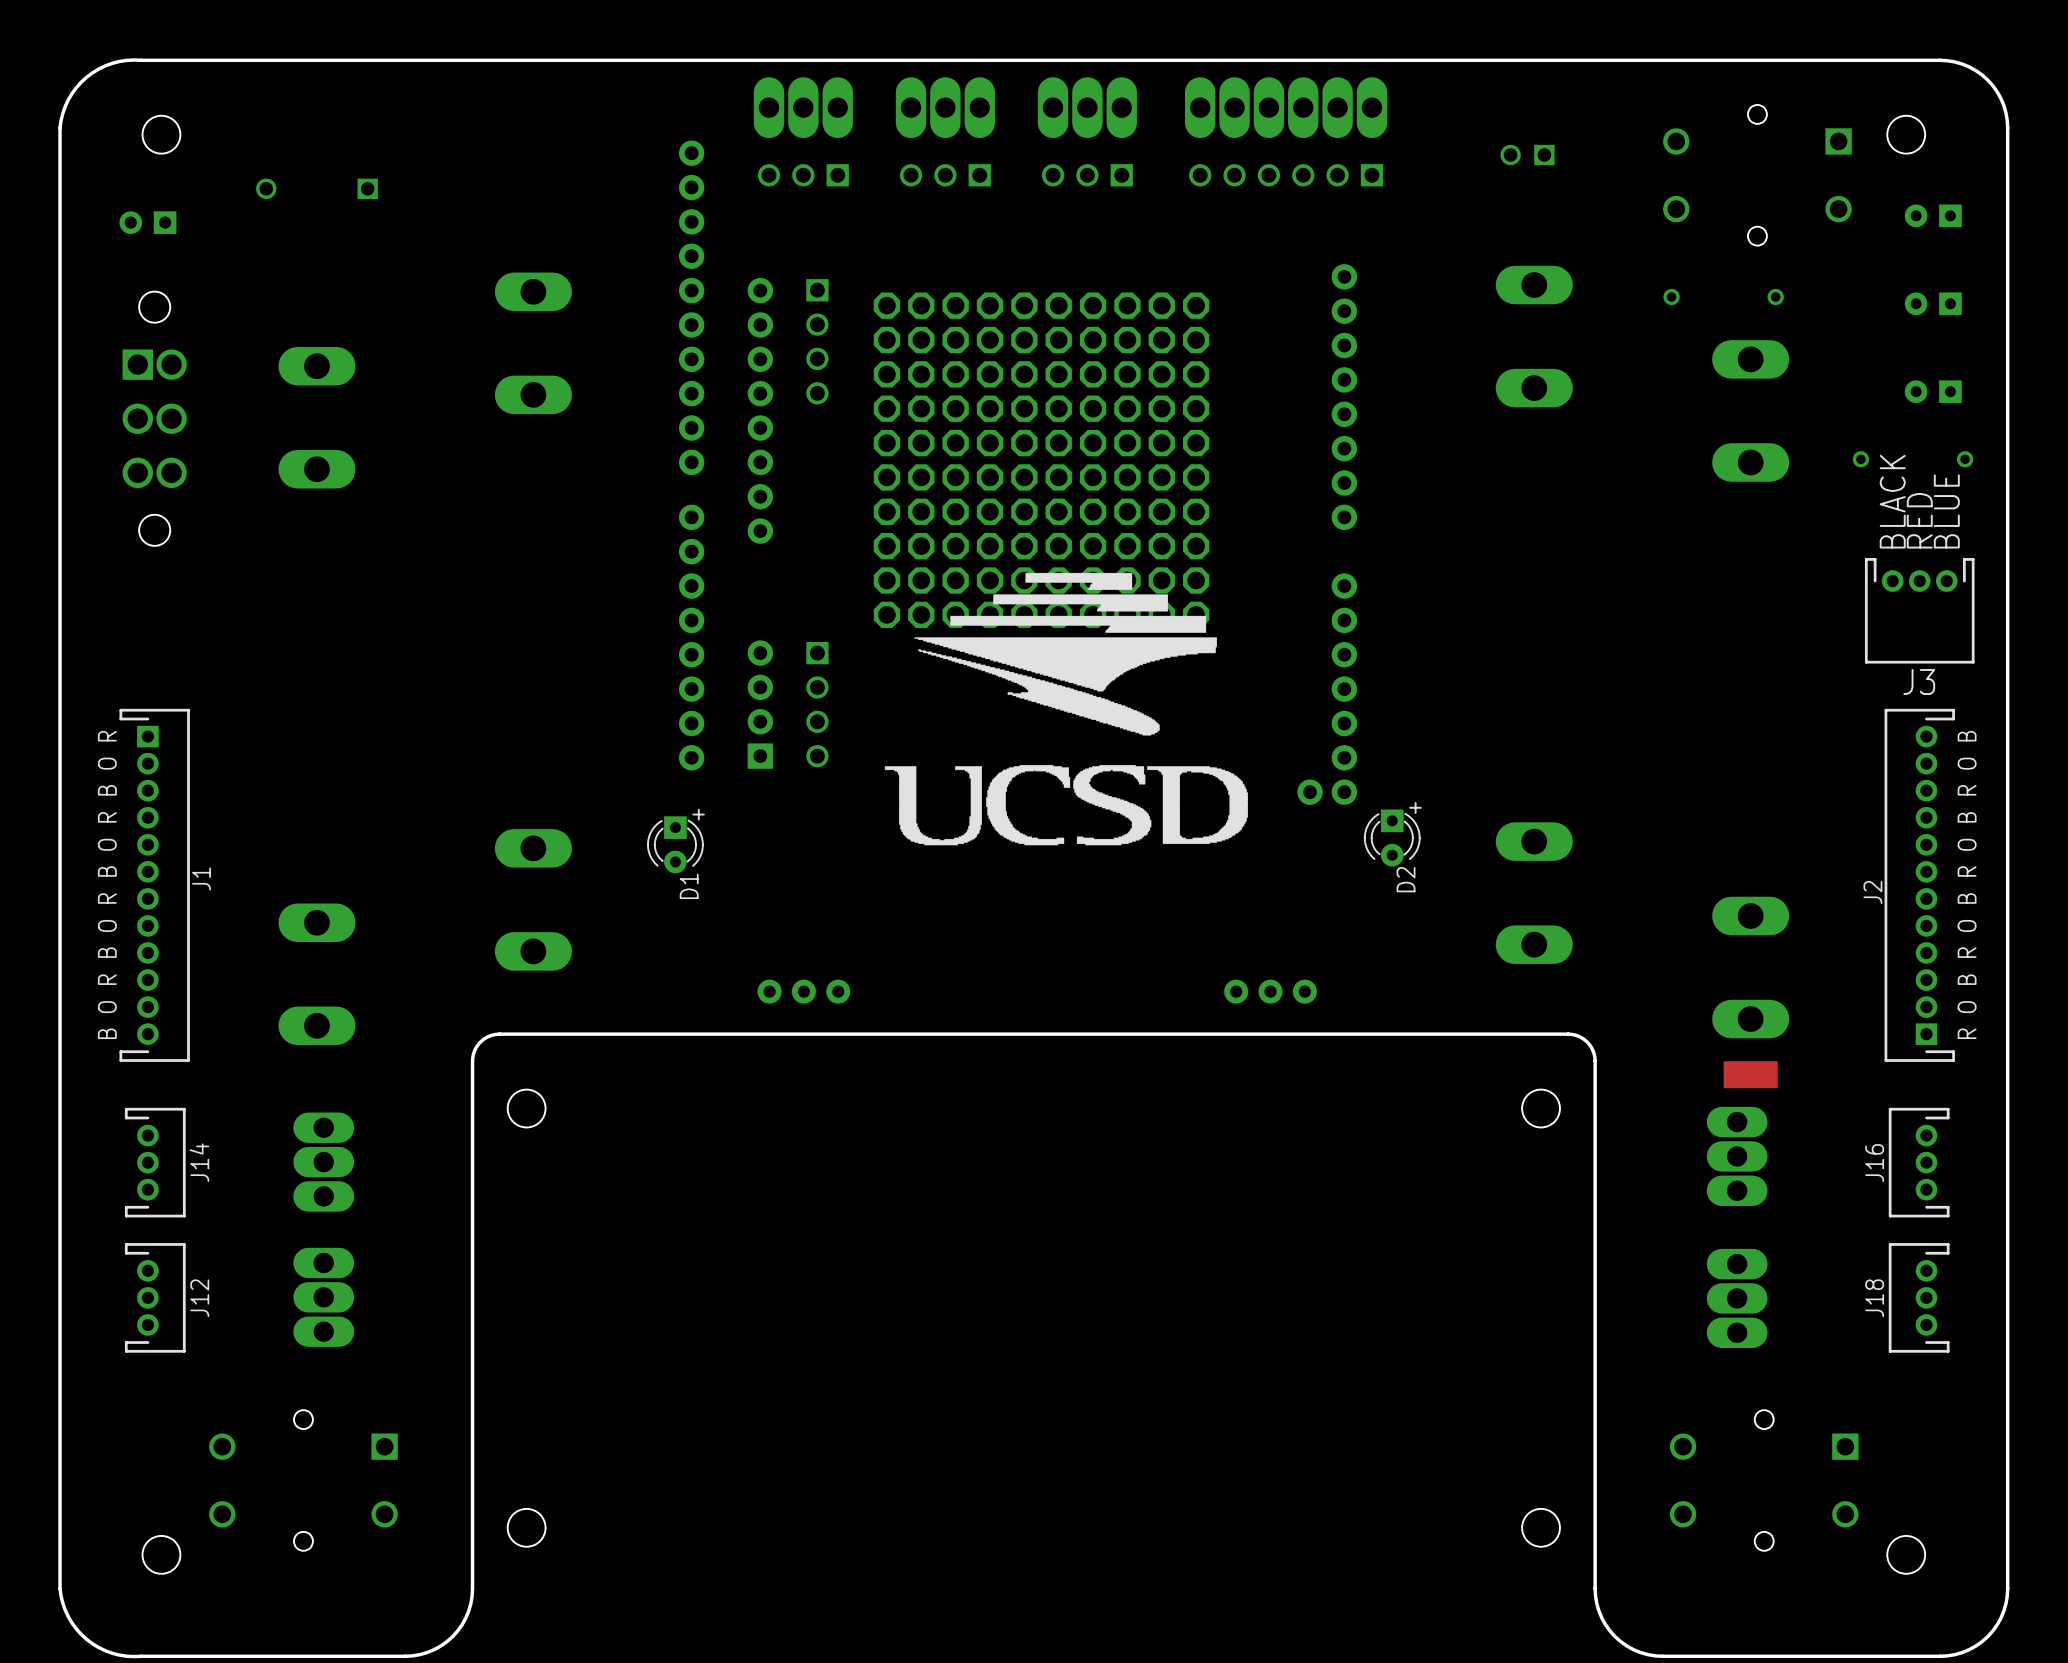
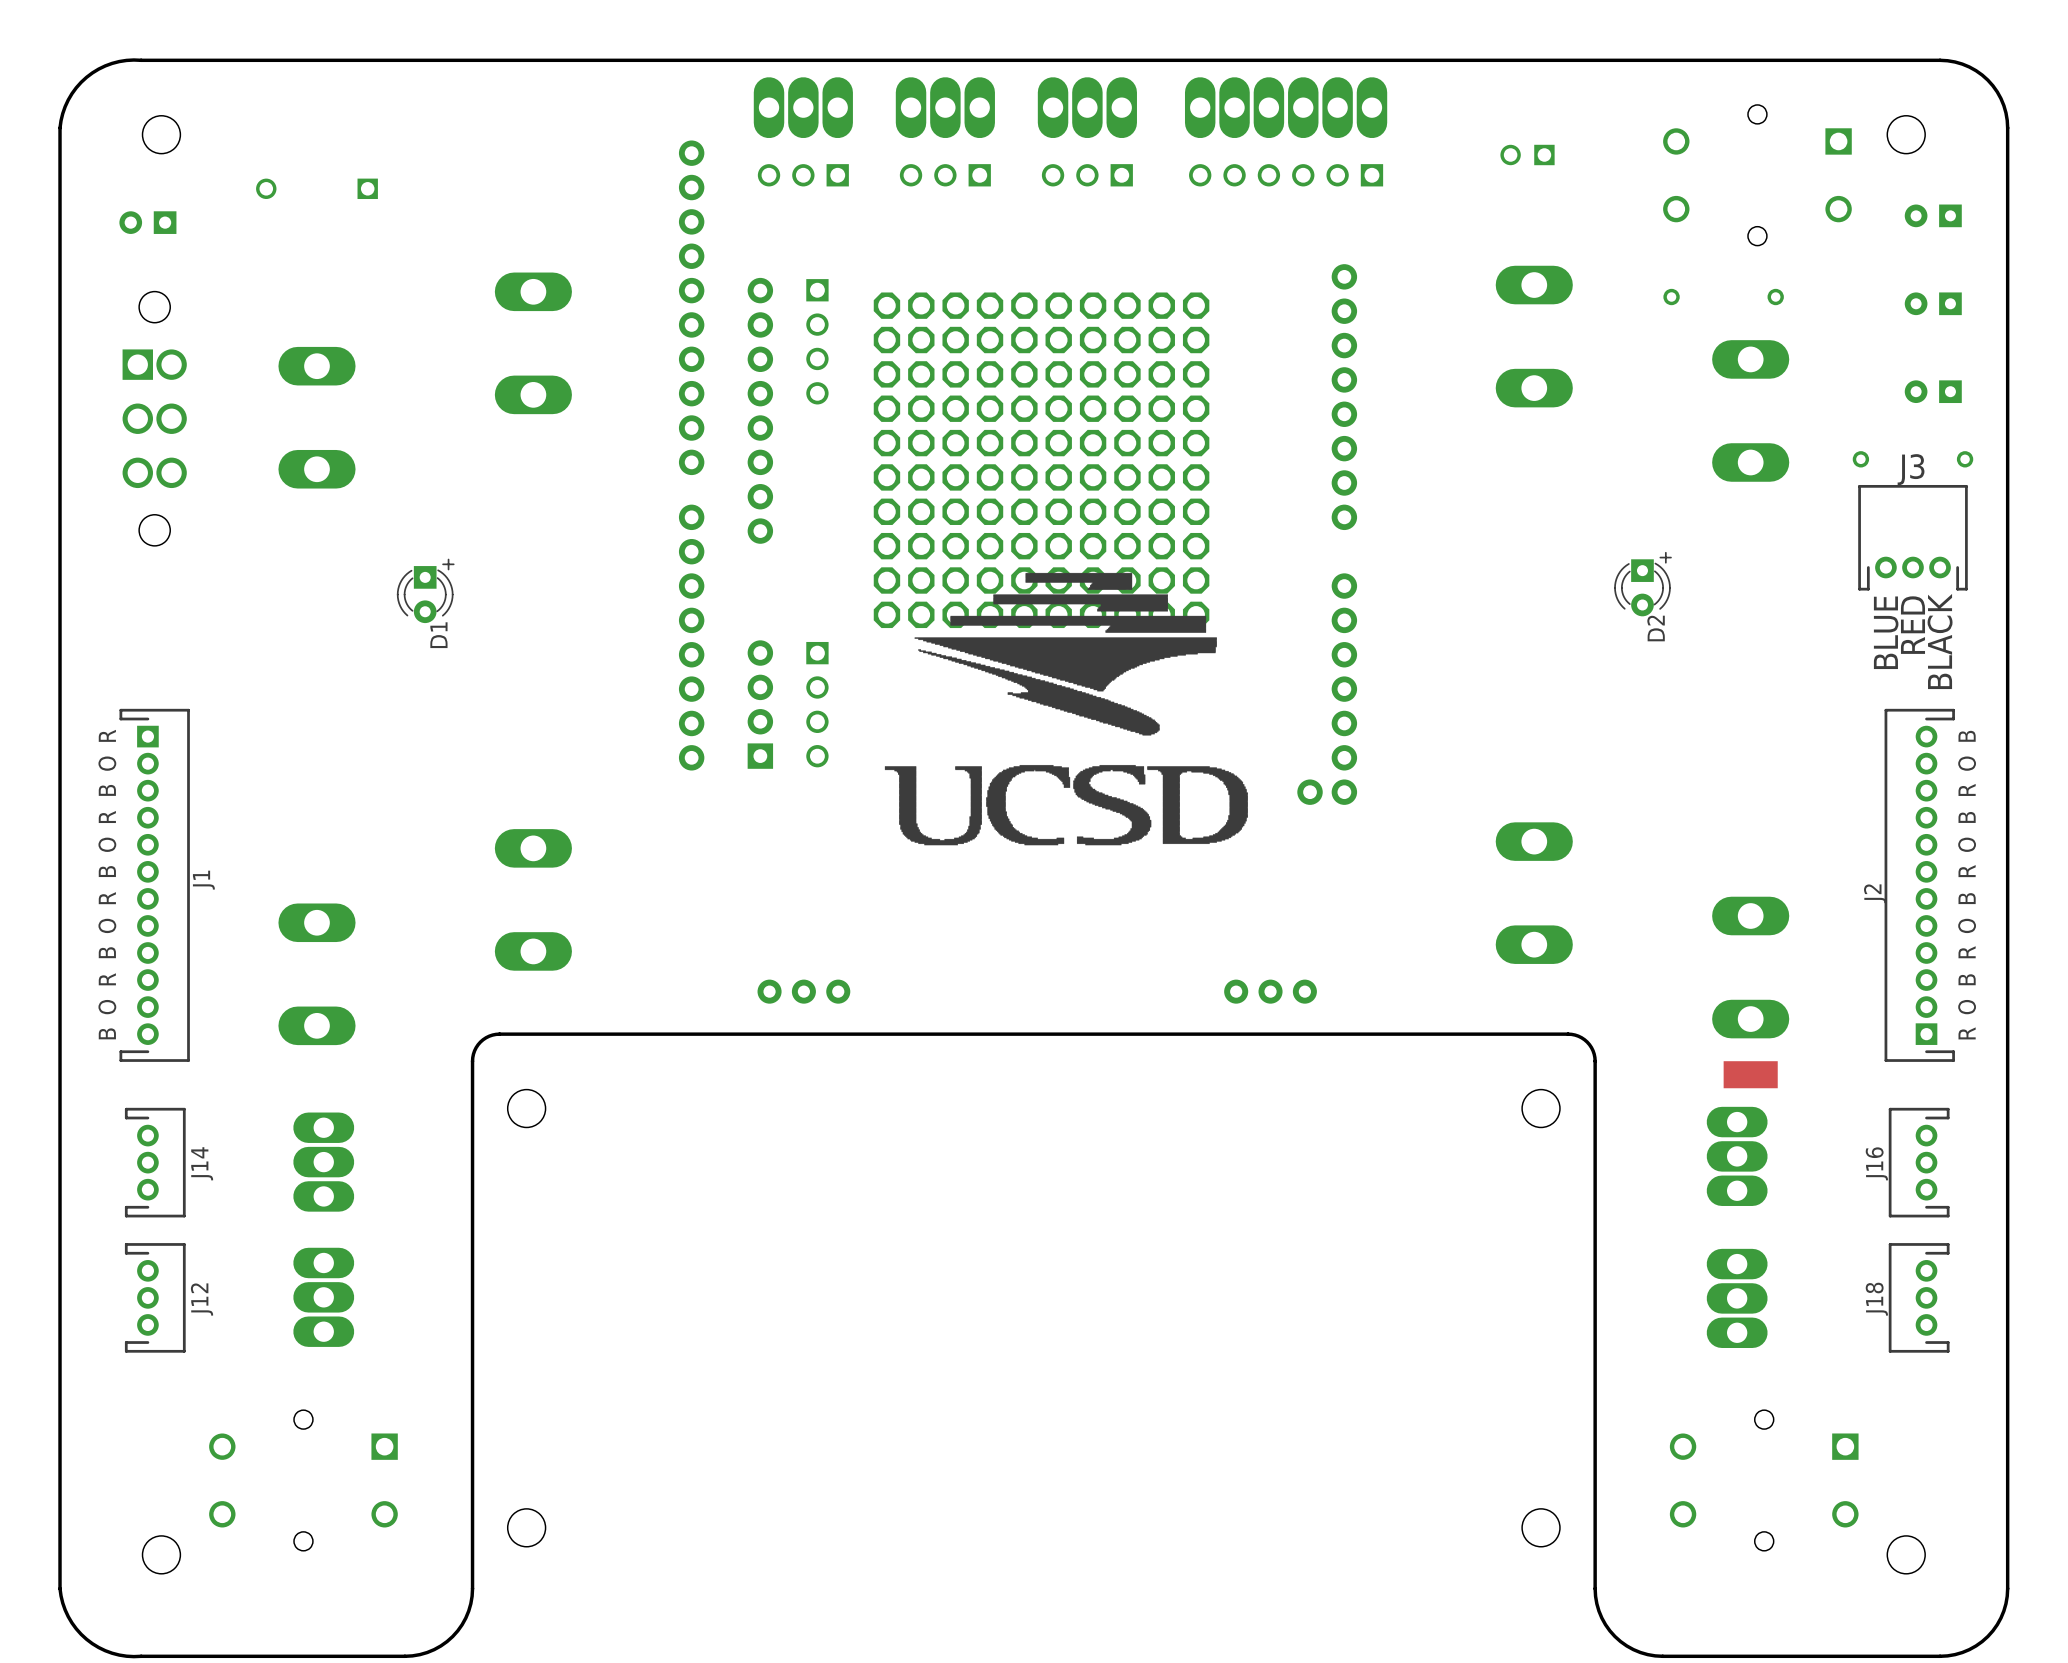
J3 footprint: [1864, 558, 1975, 664] -> [1858, 484, 1968, 591]
J3 name position: J3 (1919, 681) -> J3 (1911, 469)
D2 position: (1392, 834) -> (1642, 584)
D1 position: (675, 841) -> (425, 590)

